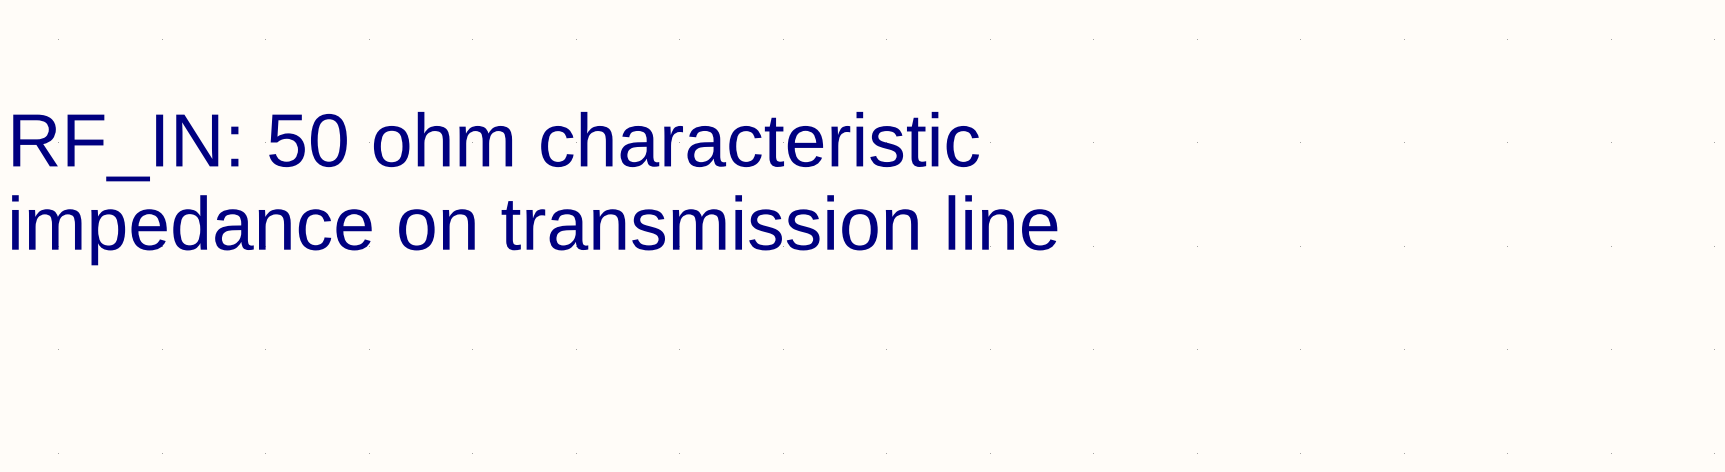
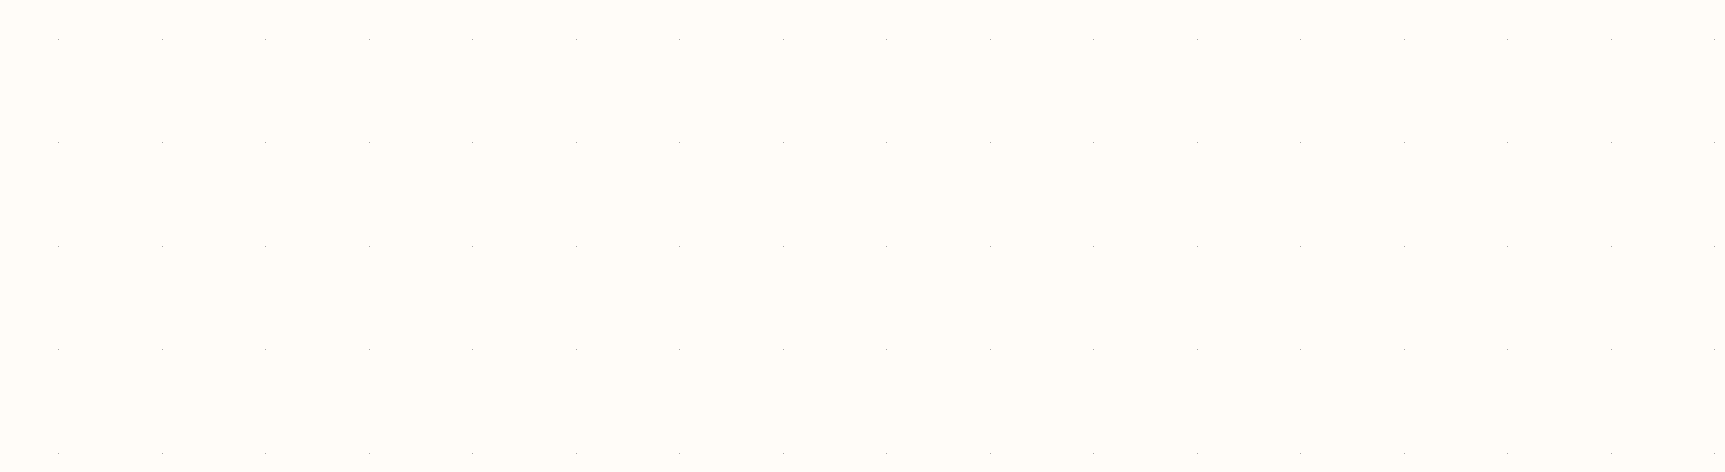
text: RF_IN: 50 ohm characteristic (496, 146) -> none
text: impedance on transmission line (534, 230) -> none

